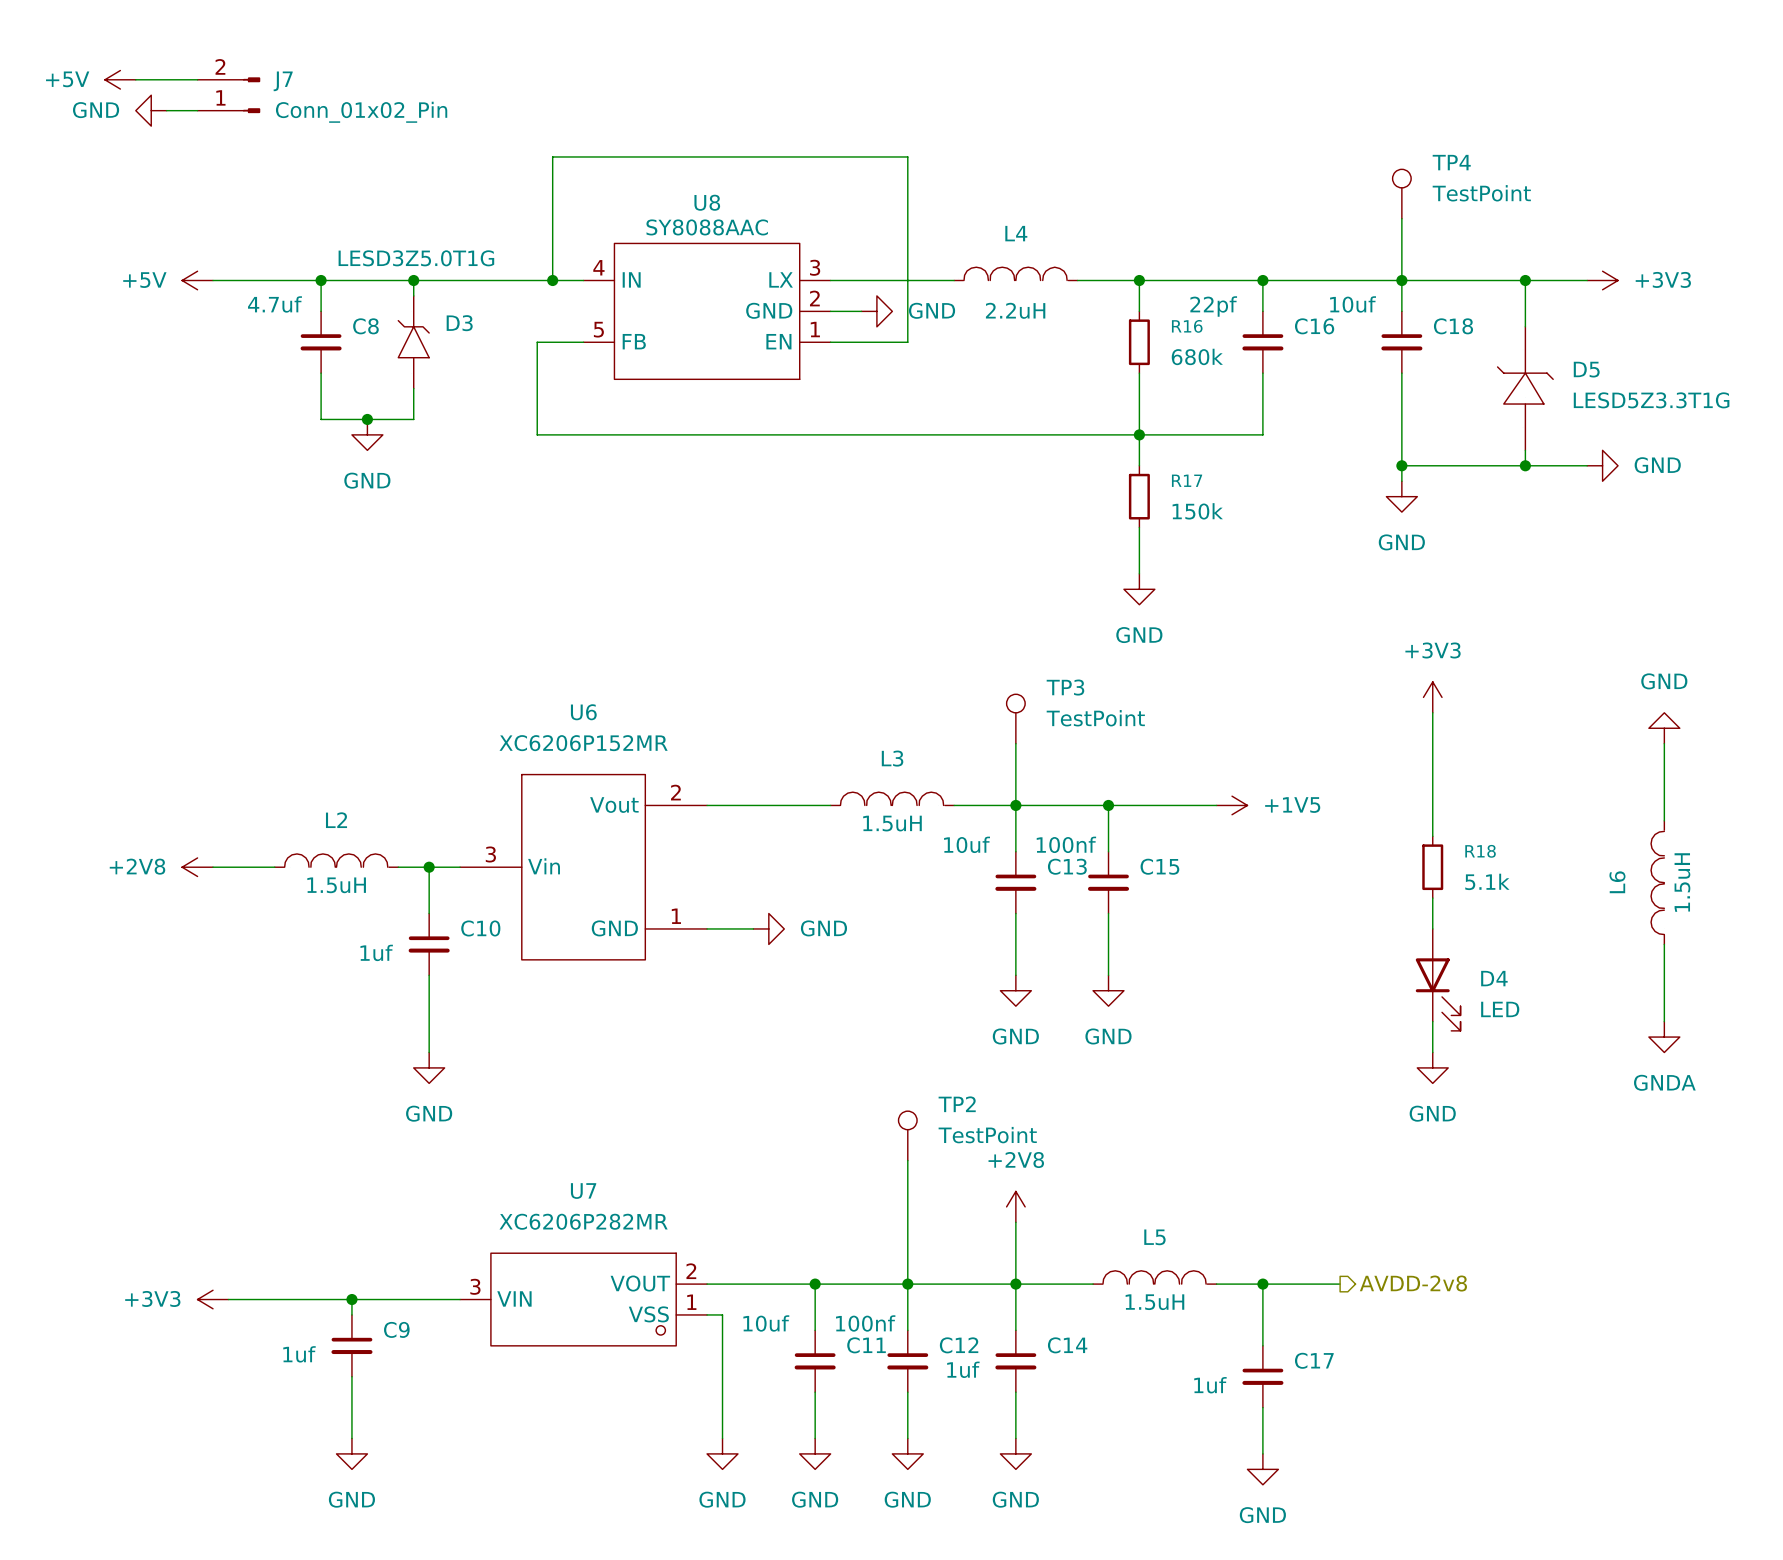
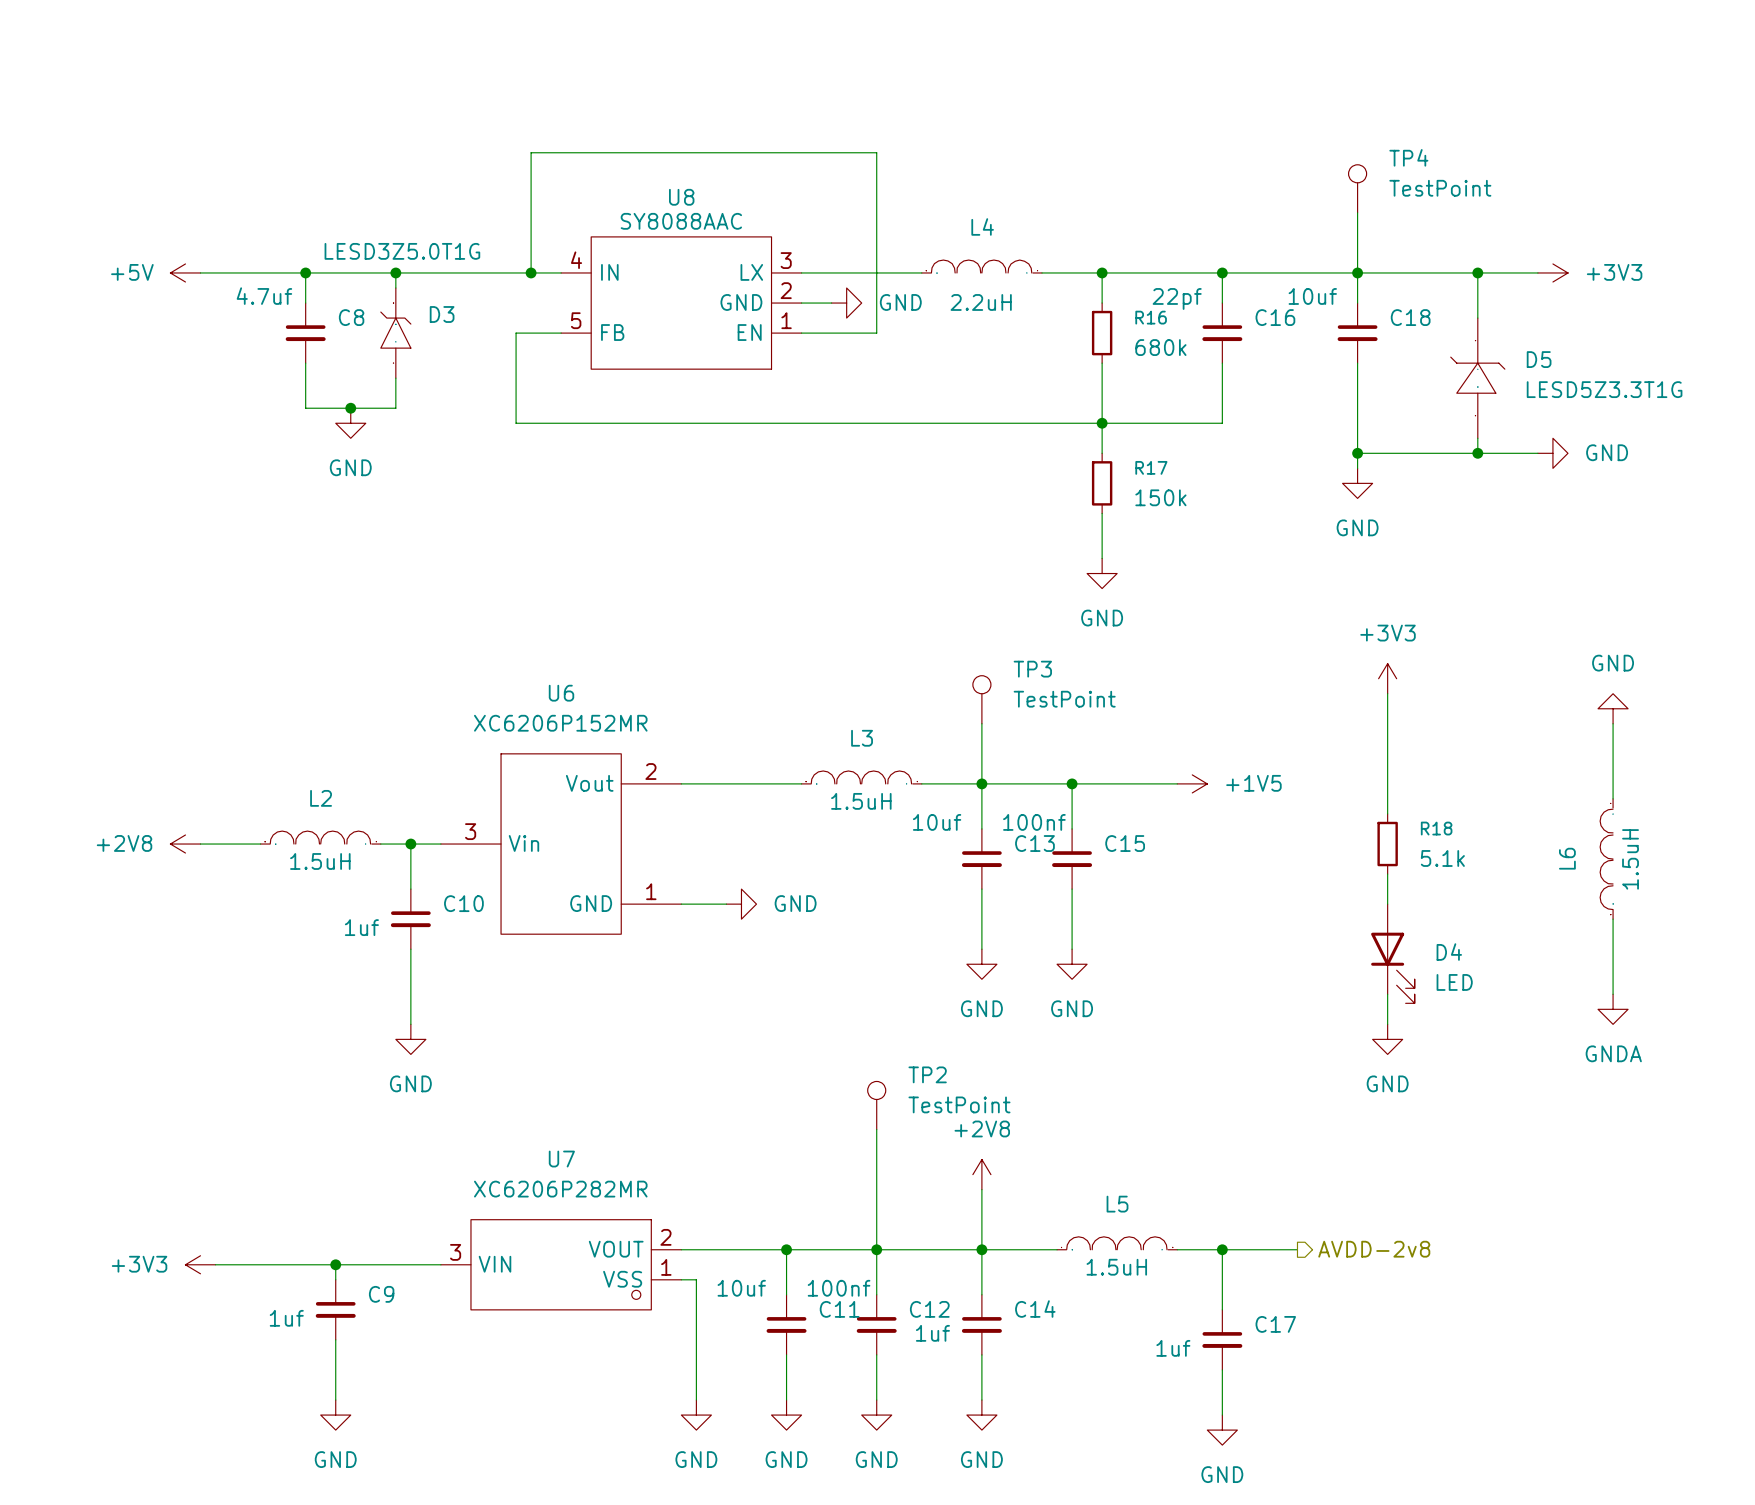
power symbol: +5V (120, 79) -> none
wire: (135, 79) (197, 79) -> none
J7: Conn_01x02_Pin (228, 95) -> none
power symbol: GND (151, 110) -> none
wire: (166, 110) (197, 110) -> none

